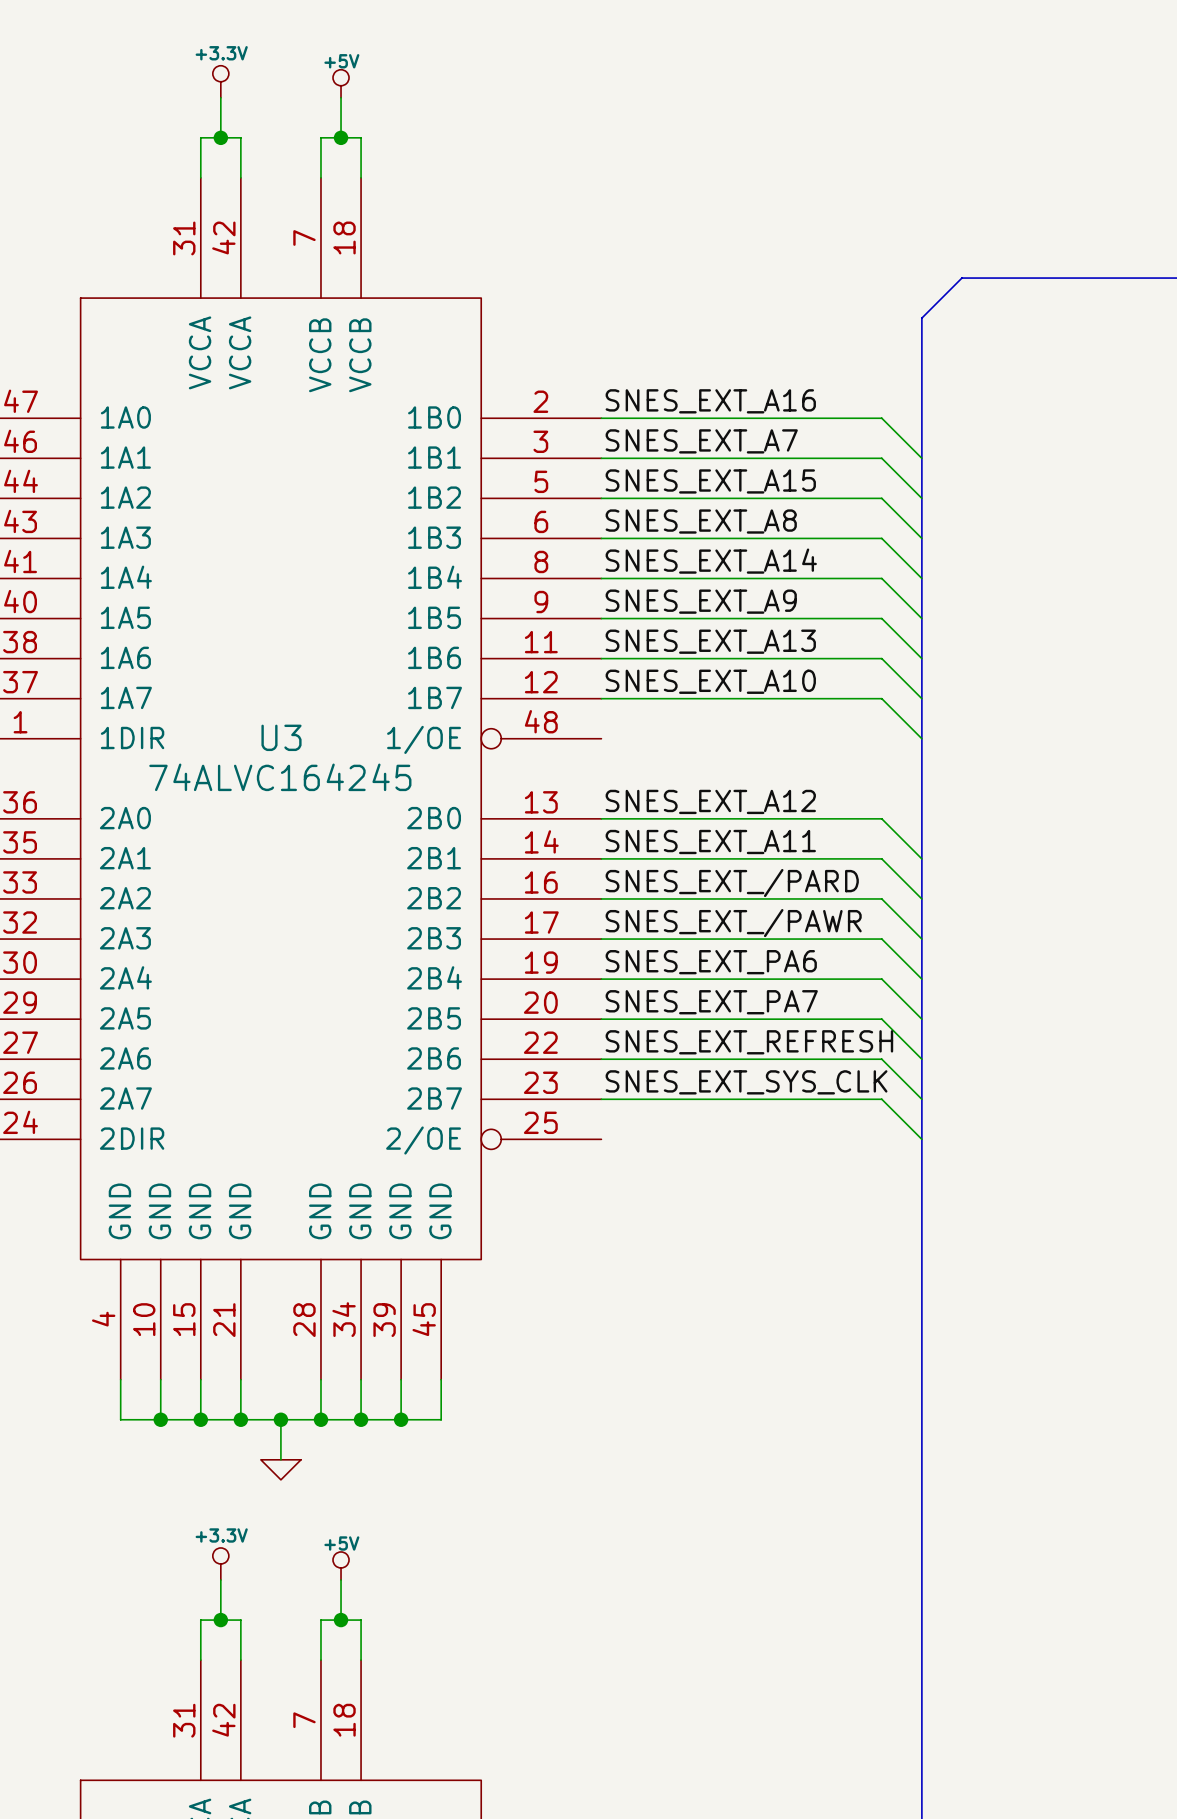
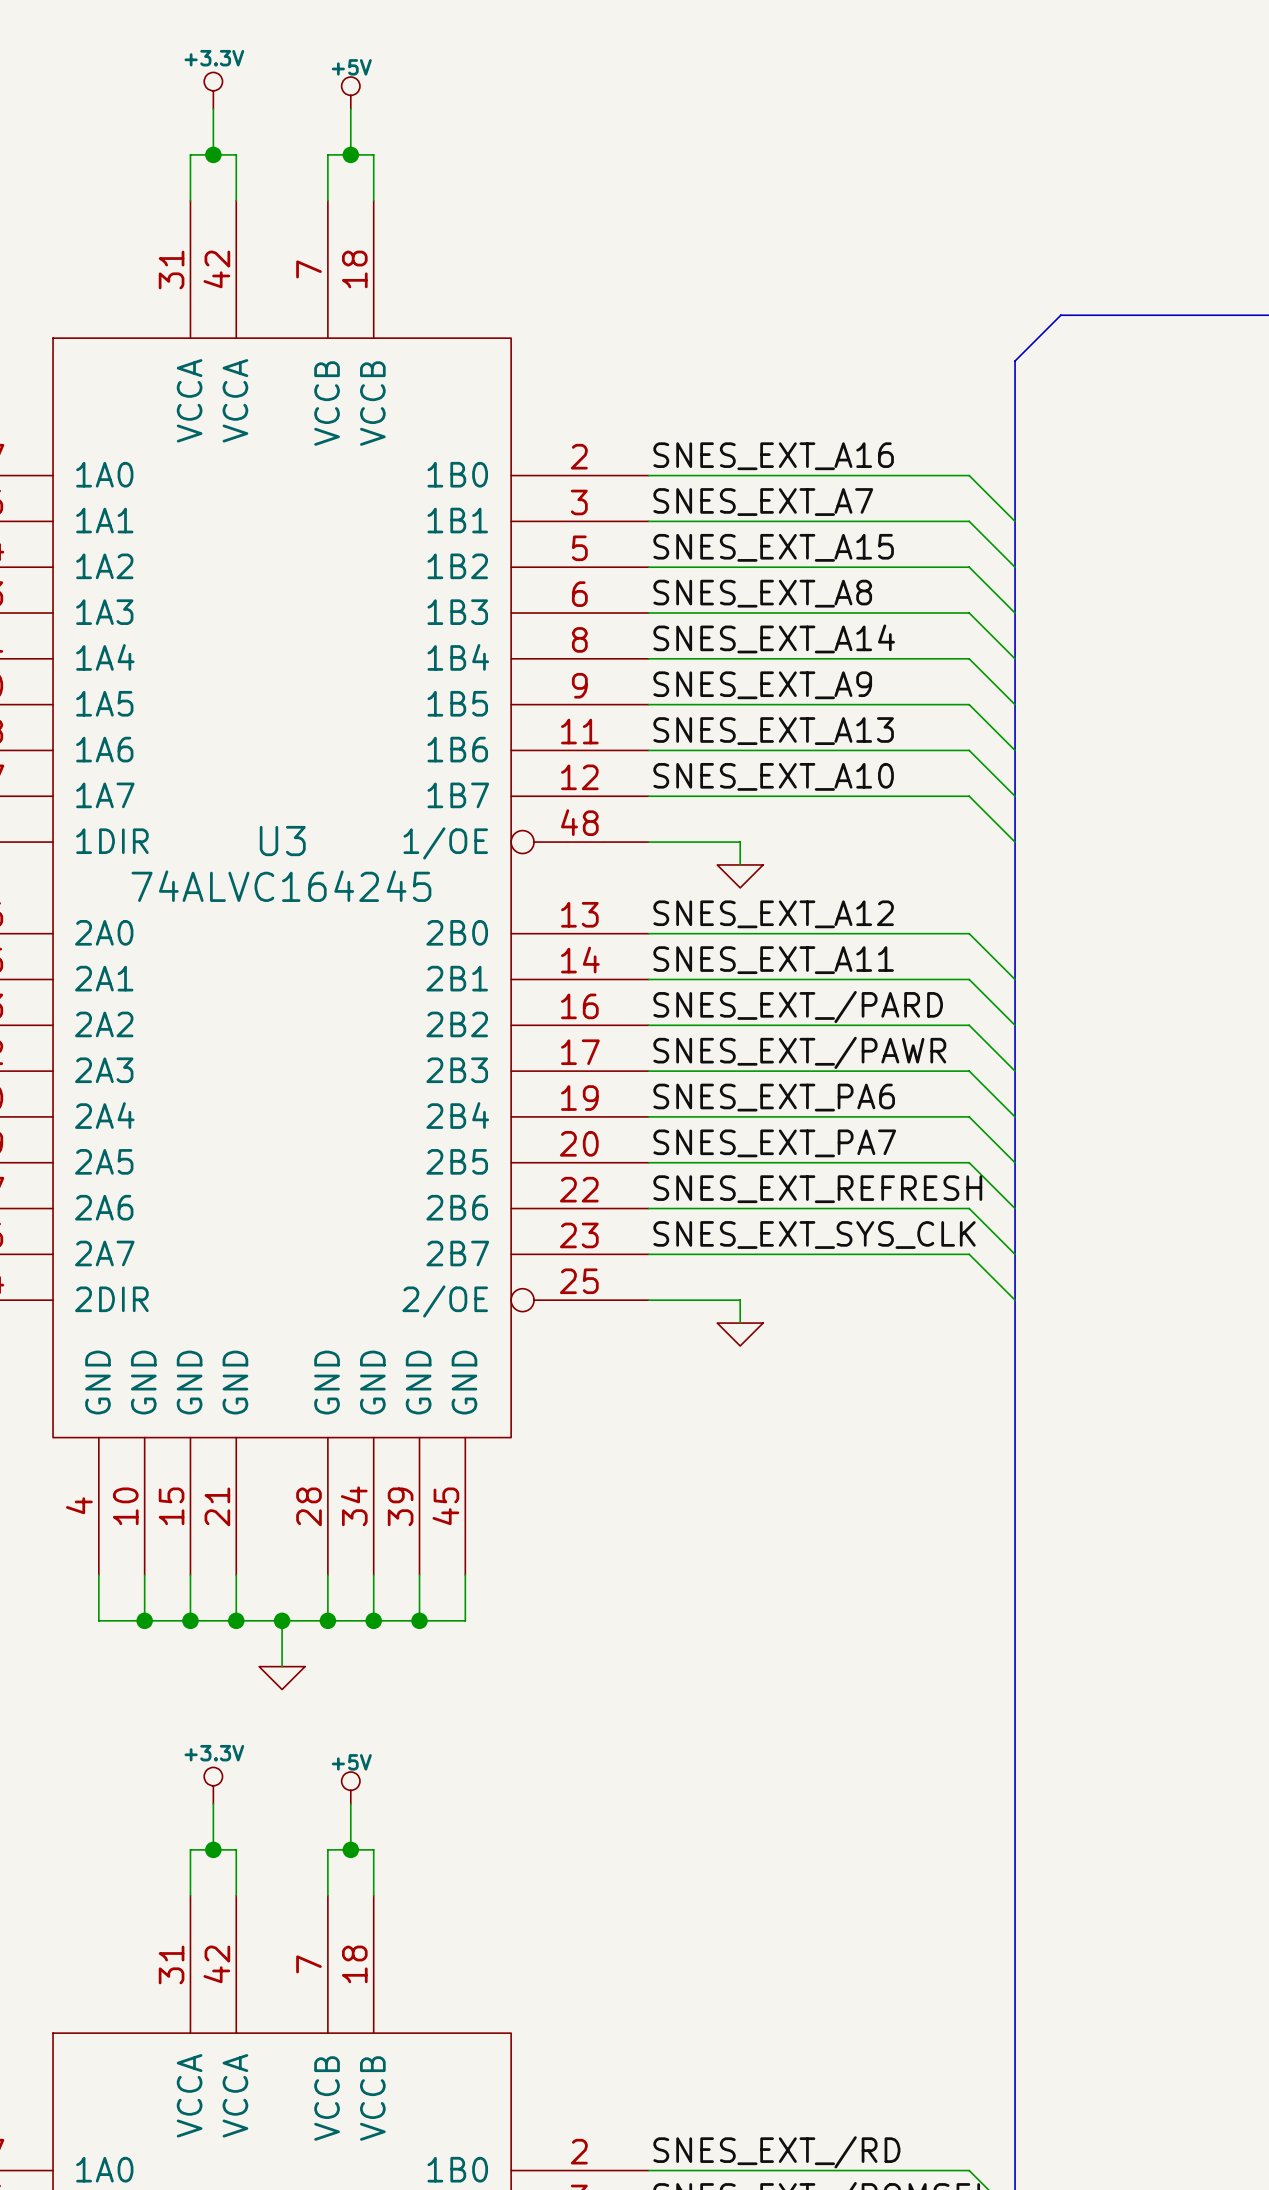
wire: none -> (648, 842) (740, 842) (740, 864)
power symbol: none -> (740, 876)
wire: none -> (648, 1300) (740, 1300) (740, 1323)
power symbol: none -> (740, 1334)

